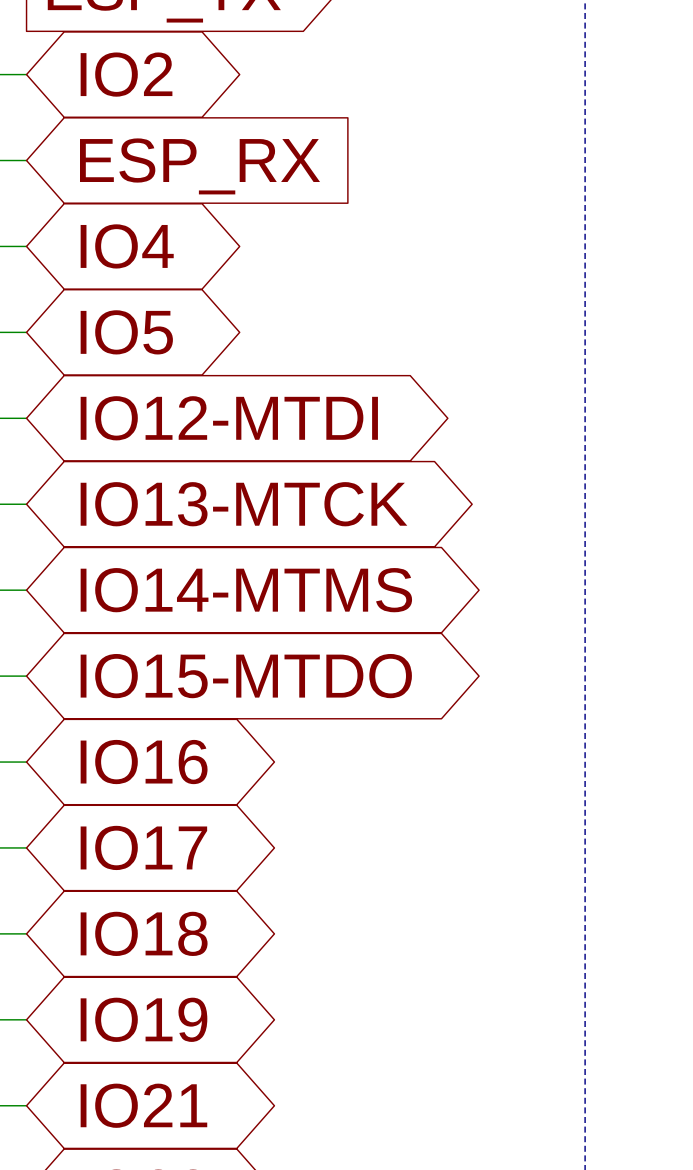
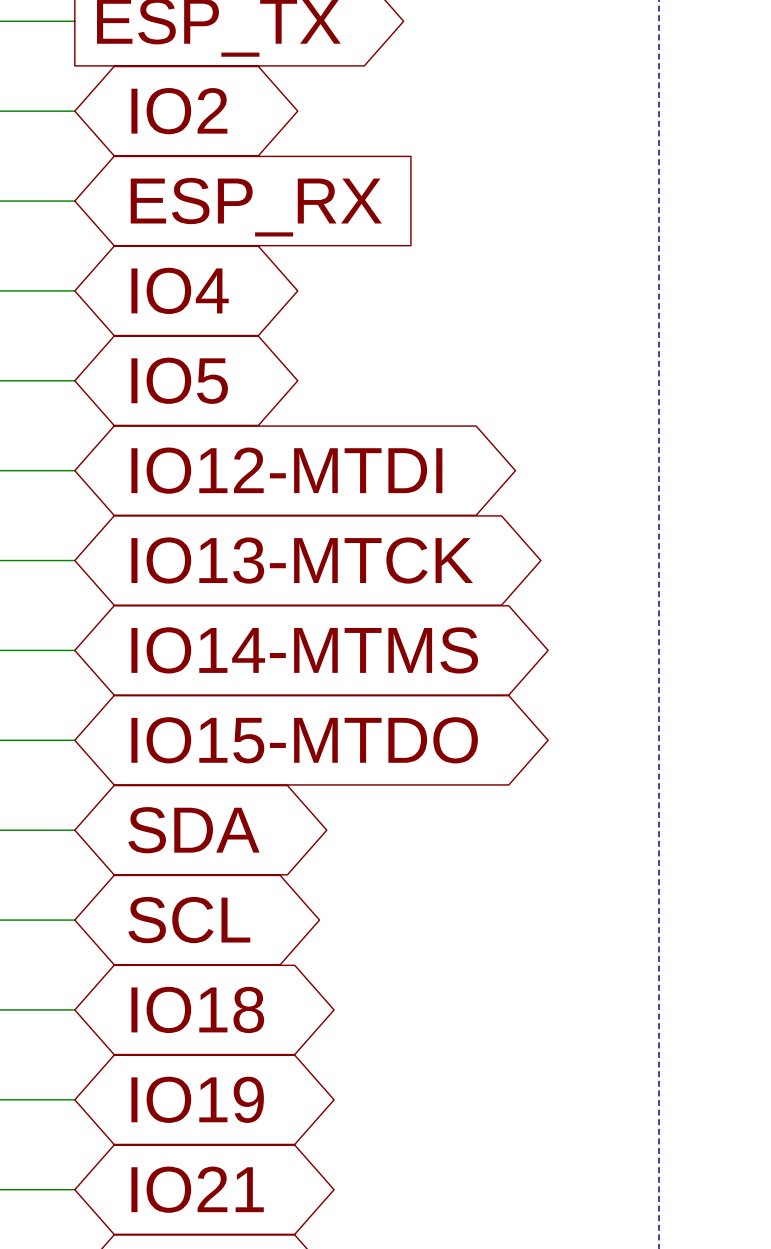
global label: IO16 (144, 762) -> SDA (193, 830)
global label: IO17 (143, 847) -> SCL (189, 920)

